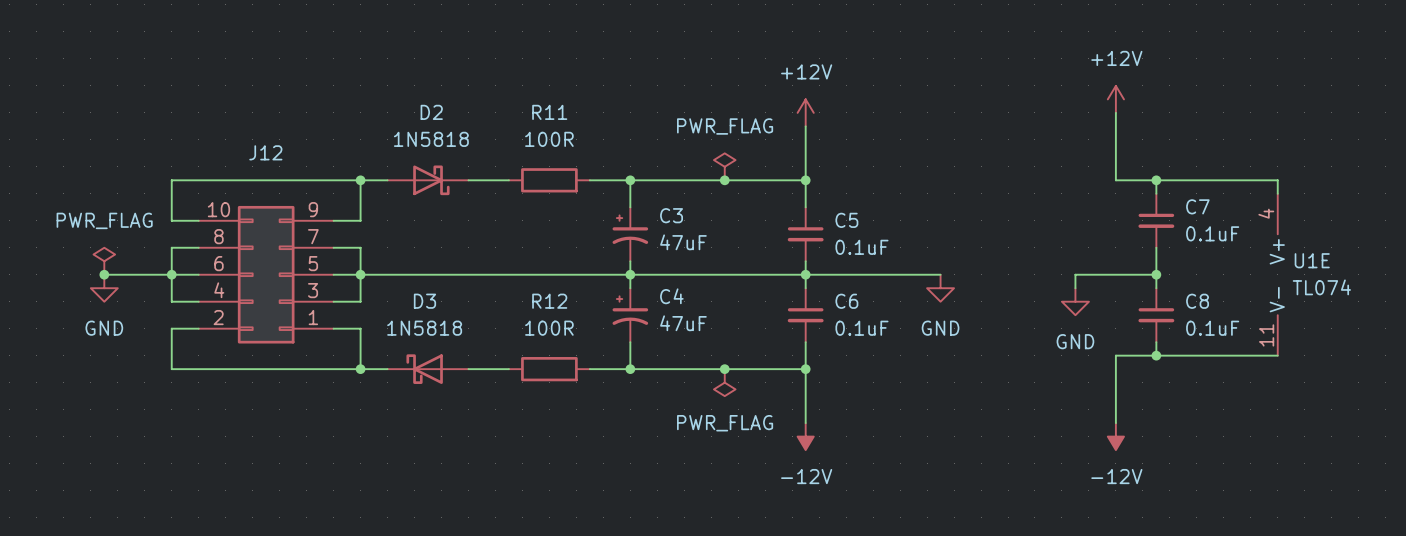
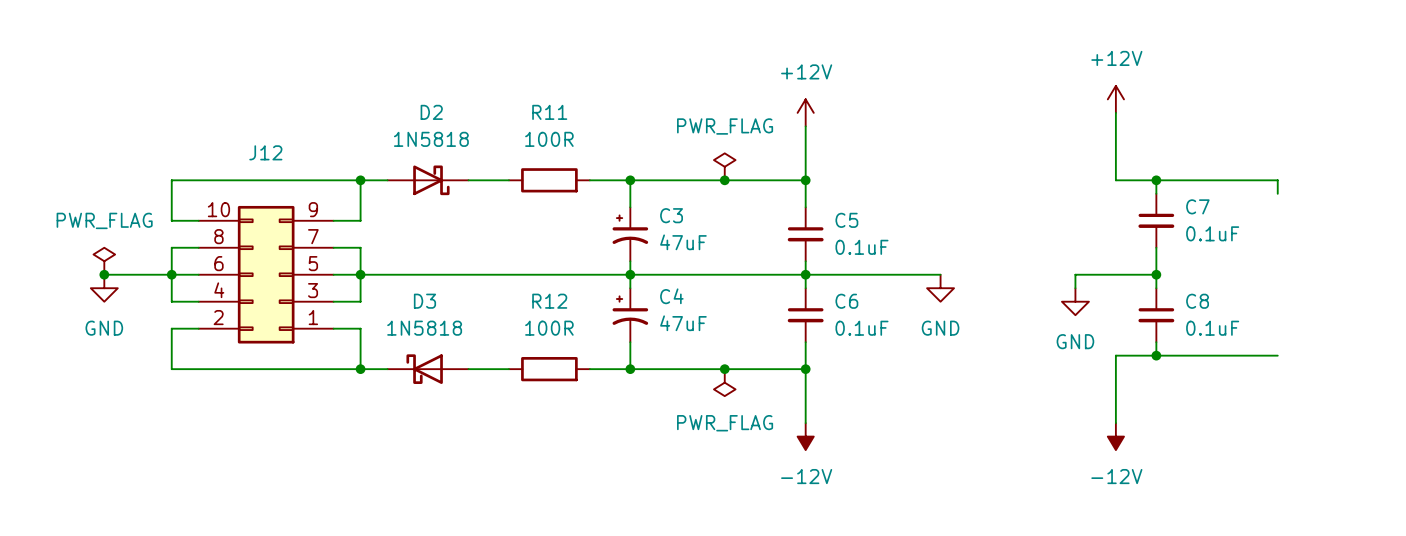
U1E: TL074 (1277, 274) -> none

